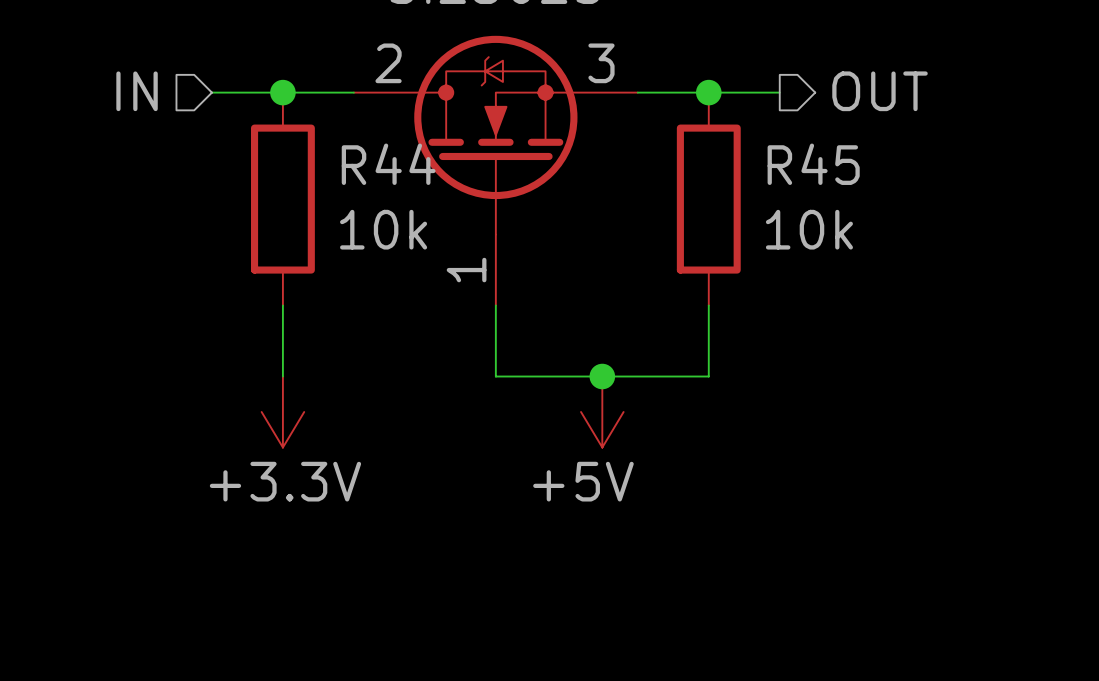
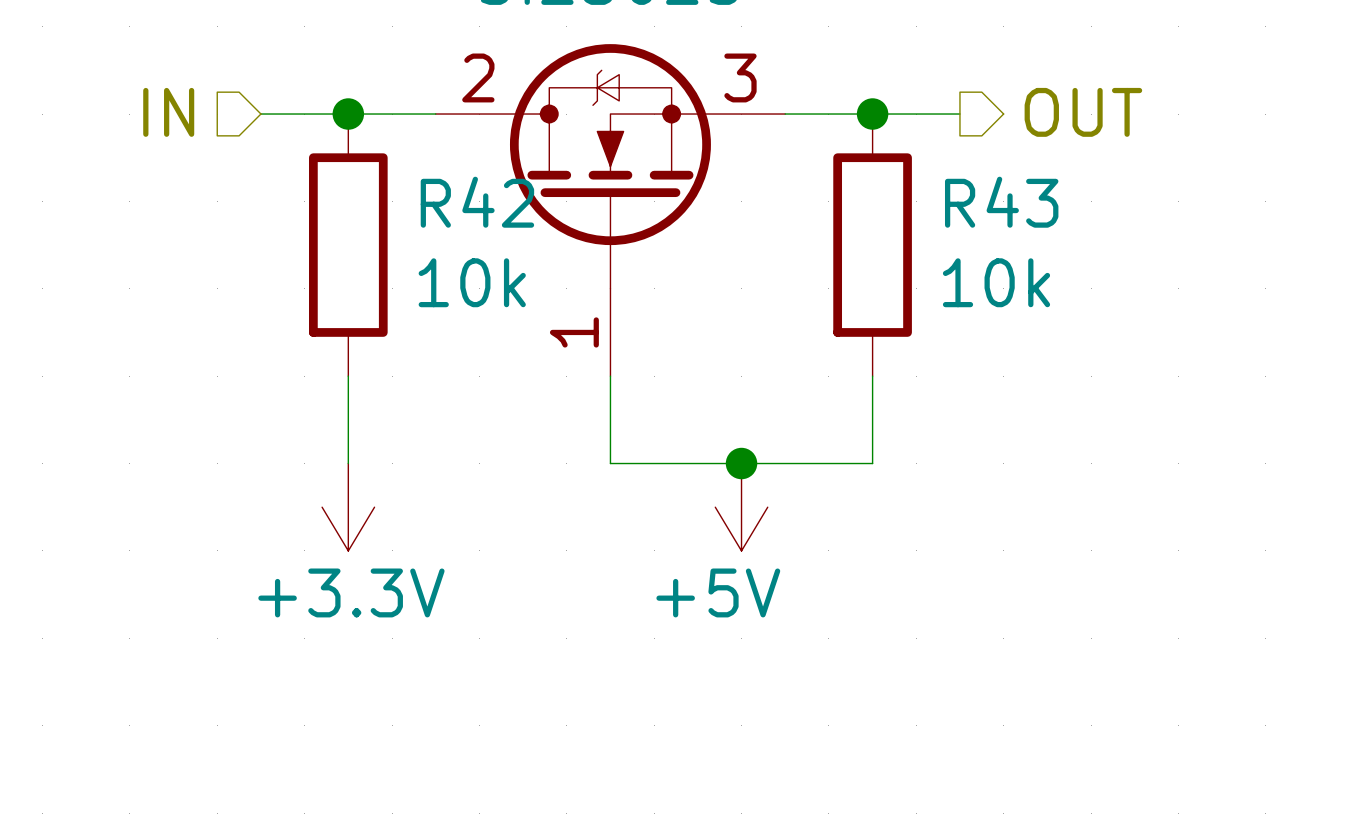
R44 name: R44 (388, 164) -> R42 (477, 202)
R45 name: R45 (813, 164) -> R43 (1001, 202)

